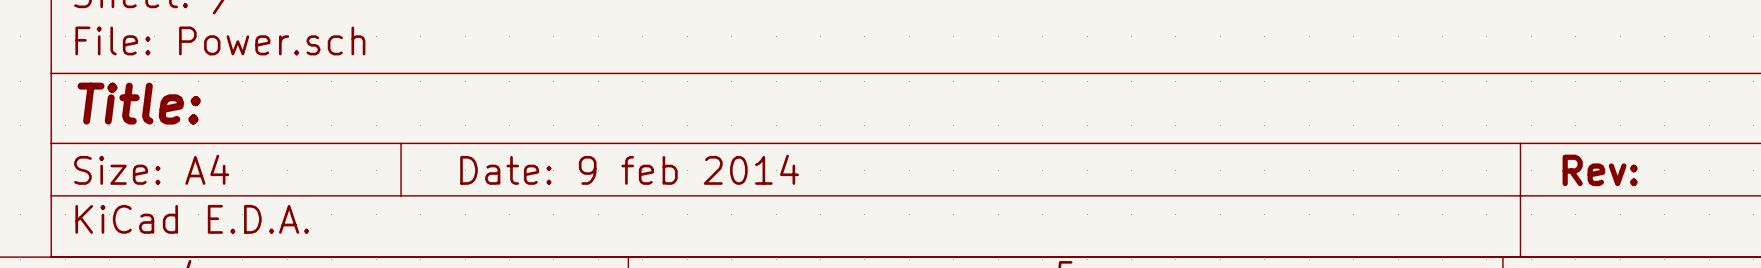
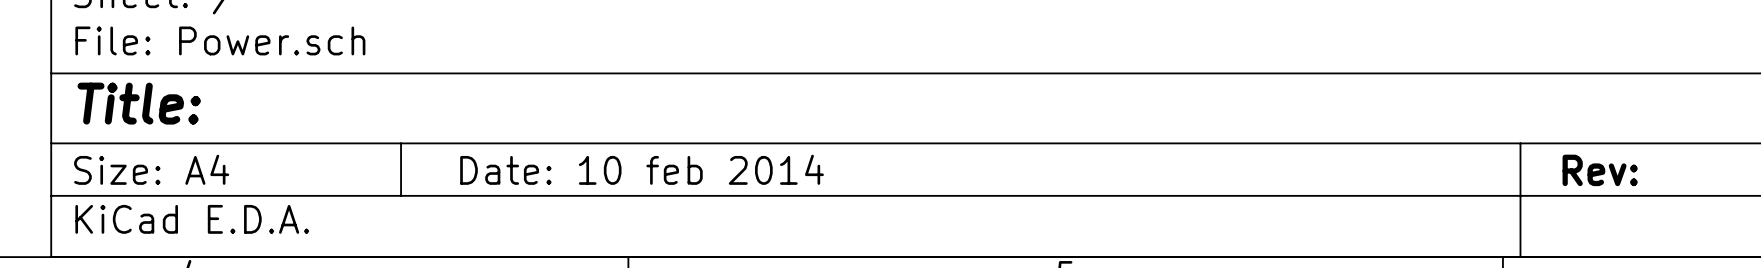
title block: Date: 9 feb 2014 (629, 169) -> Date: 10 feb 2014 (642, 169)

